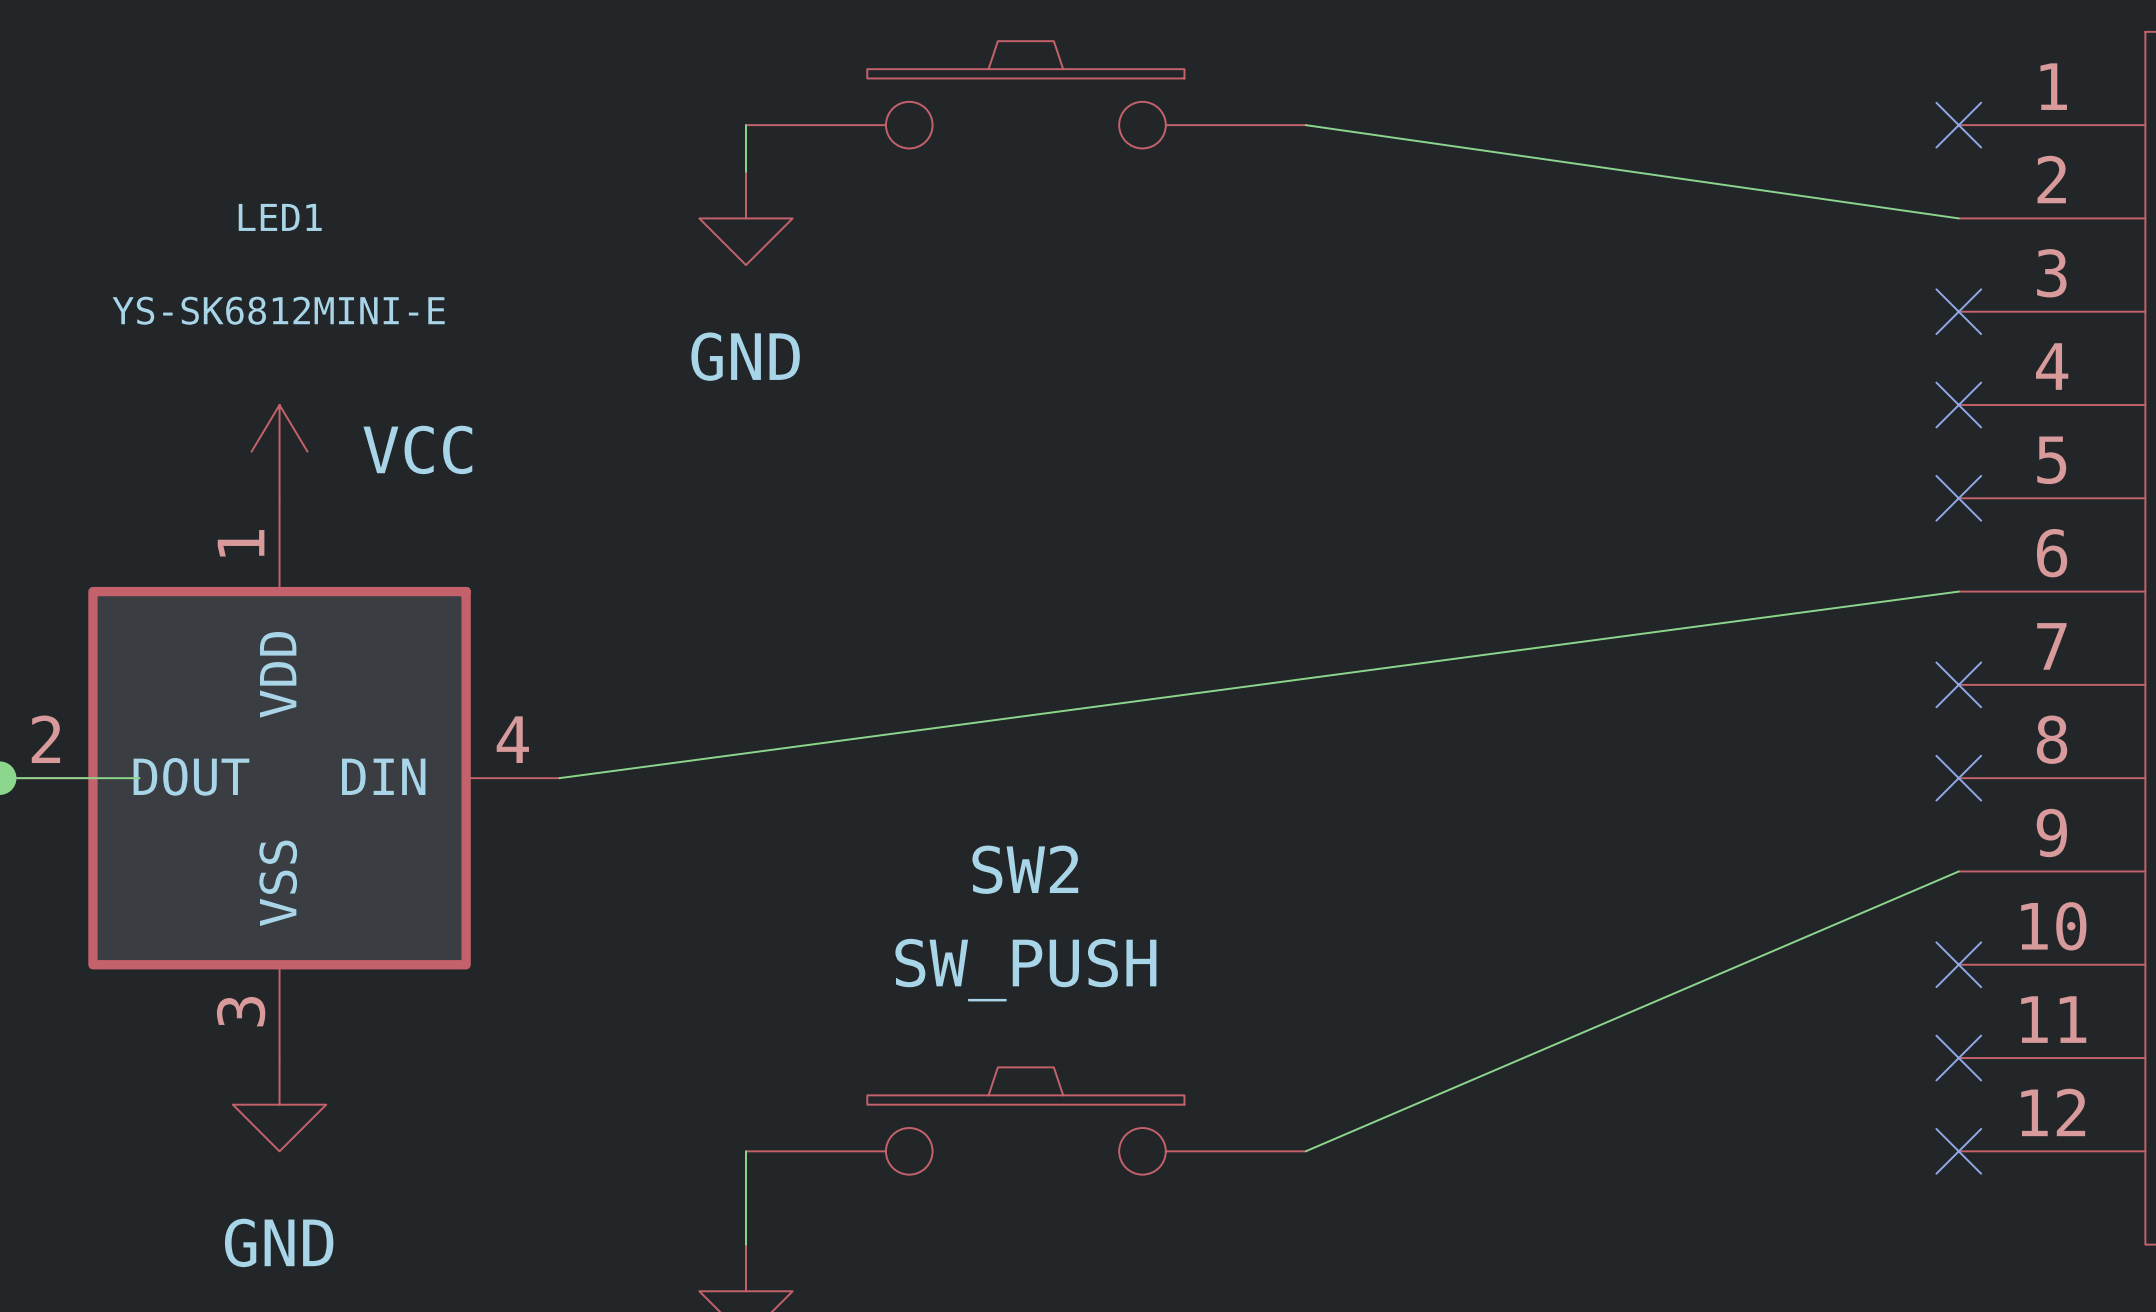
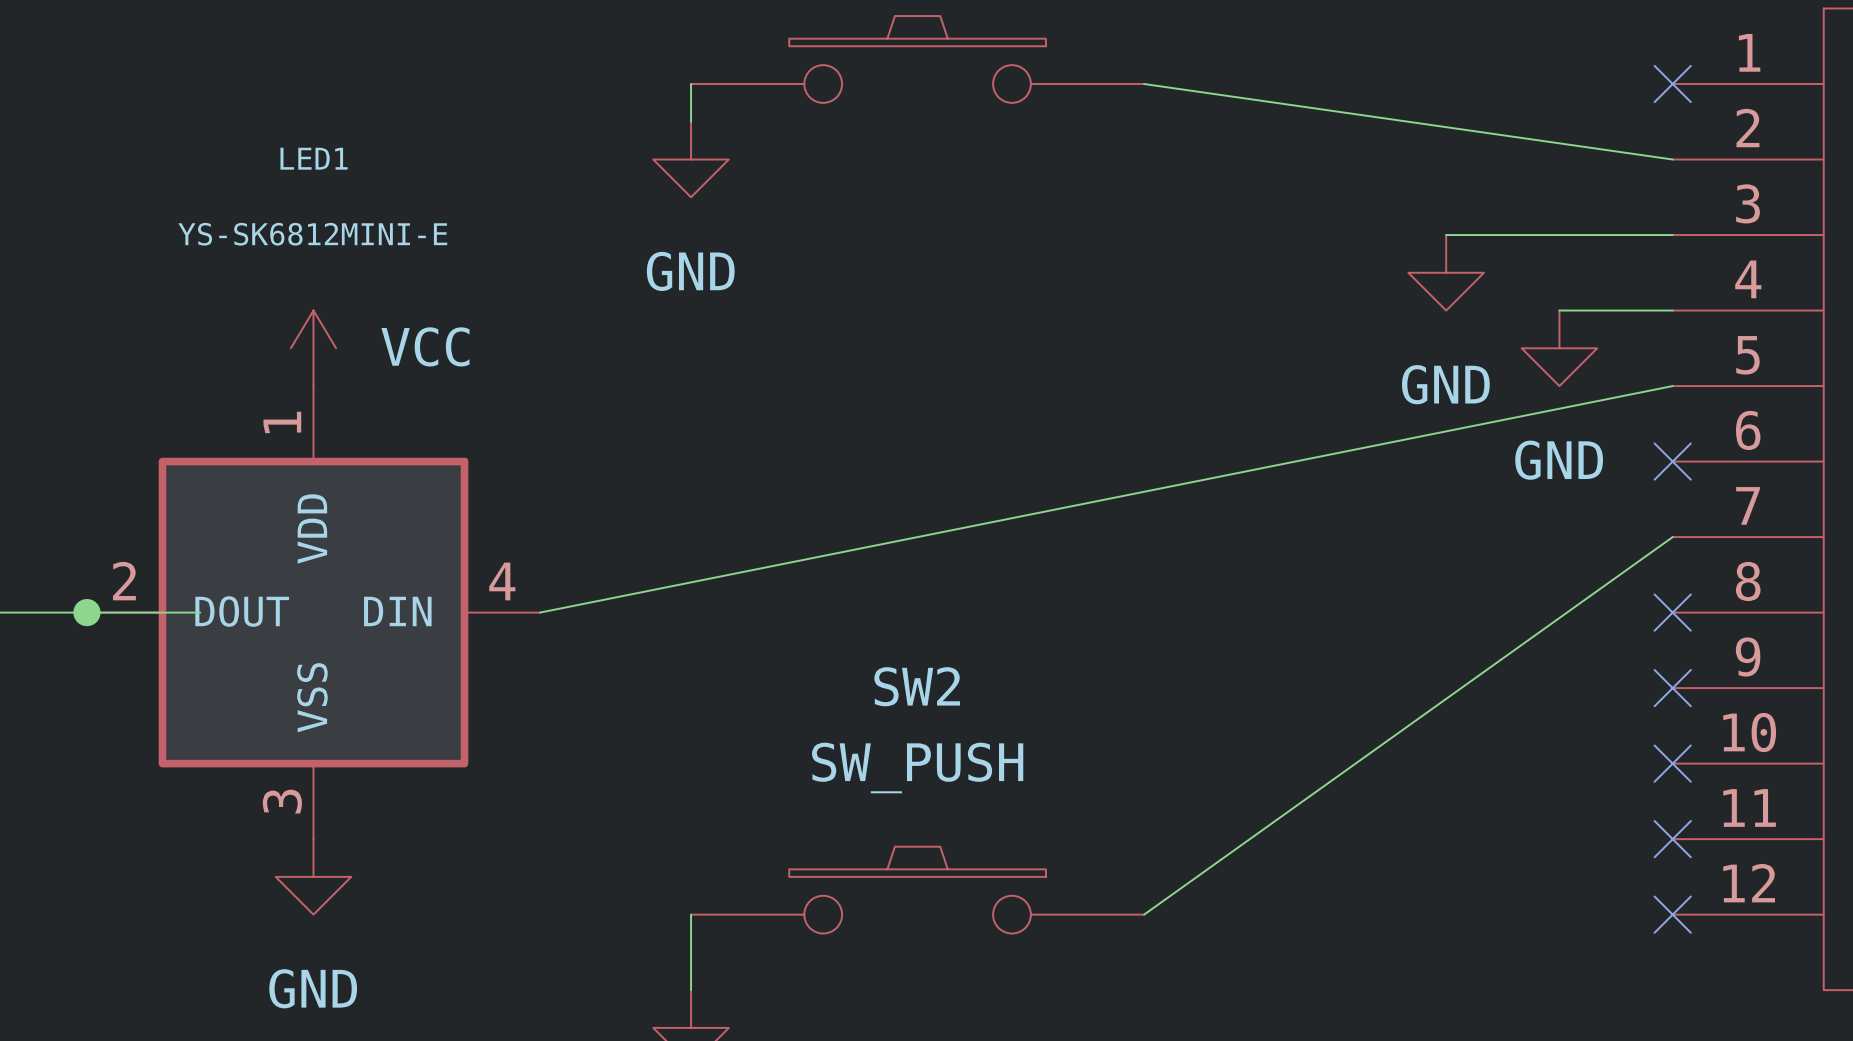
wire: none -> (1446, 235) (1672, 235)
no-connect mark: (1958, 311) -> none
power symbol: none -> GND (1446, 272)
wire: none -> (1559, 310) (1672, 310)
no-connect mark: (1958, 405) -> none
power symbol: none -> GND (1559, 348)
no-connect mark: (1958, 498) -> none
wire: (1958, 591) (559, 778) -> (1672, 386) (540, 612)
no-connect mark: none -> (1672, 461)
no-connect mark: (1958, 684) -> none
wire: (1958, 871) (1305, 1151) -> (1672, 537) (1144, 914)
no-connect mark: none -> (1672, 688)

